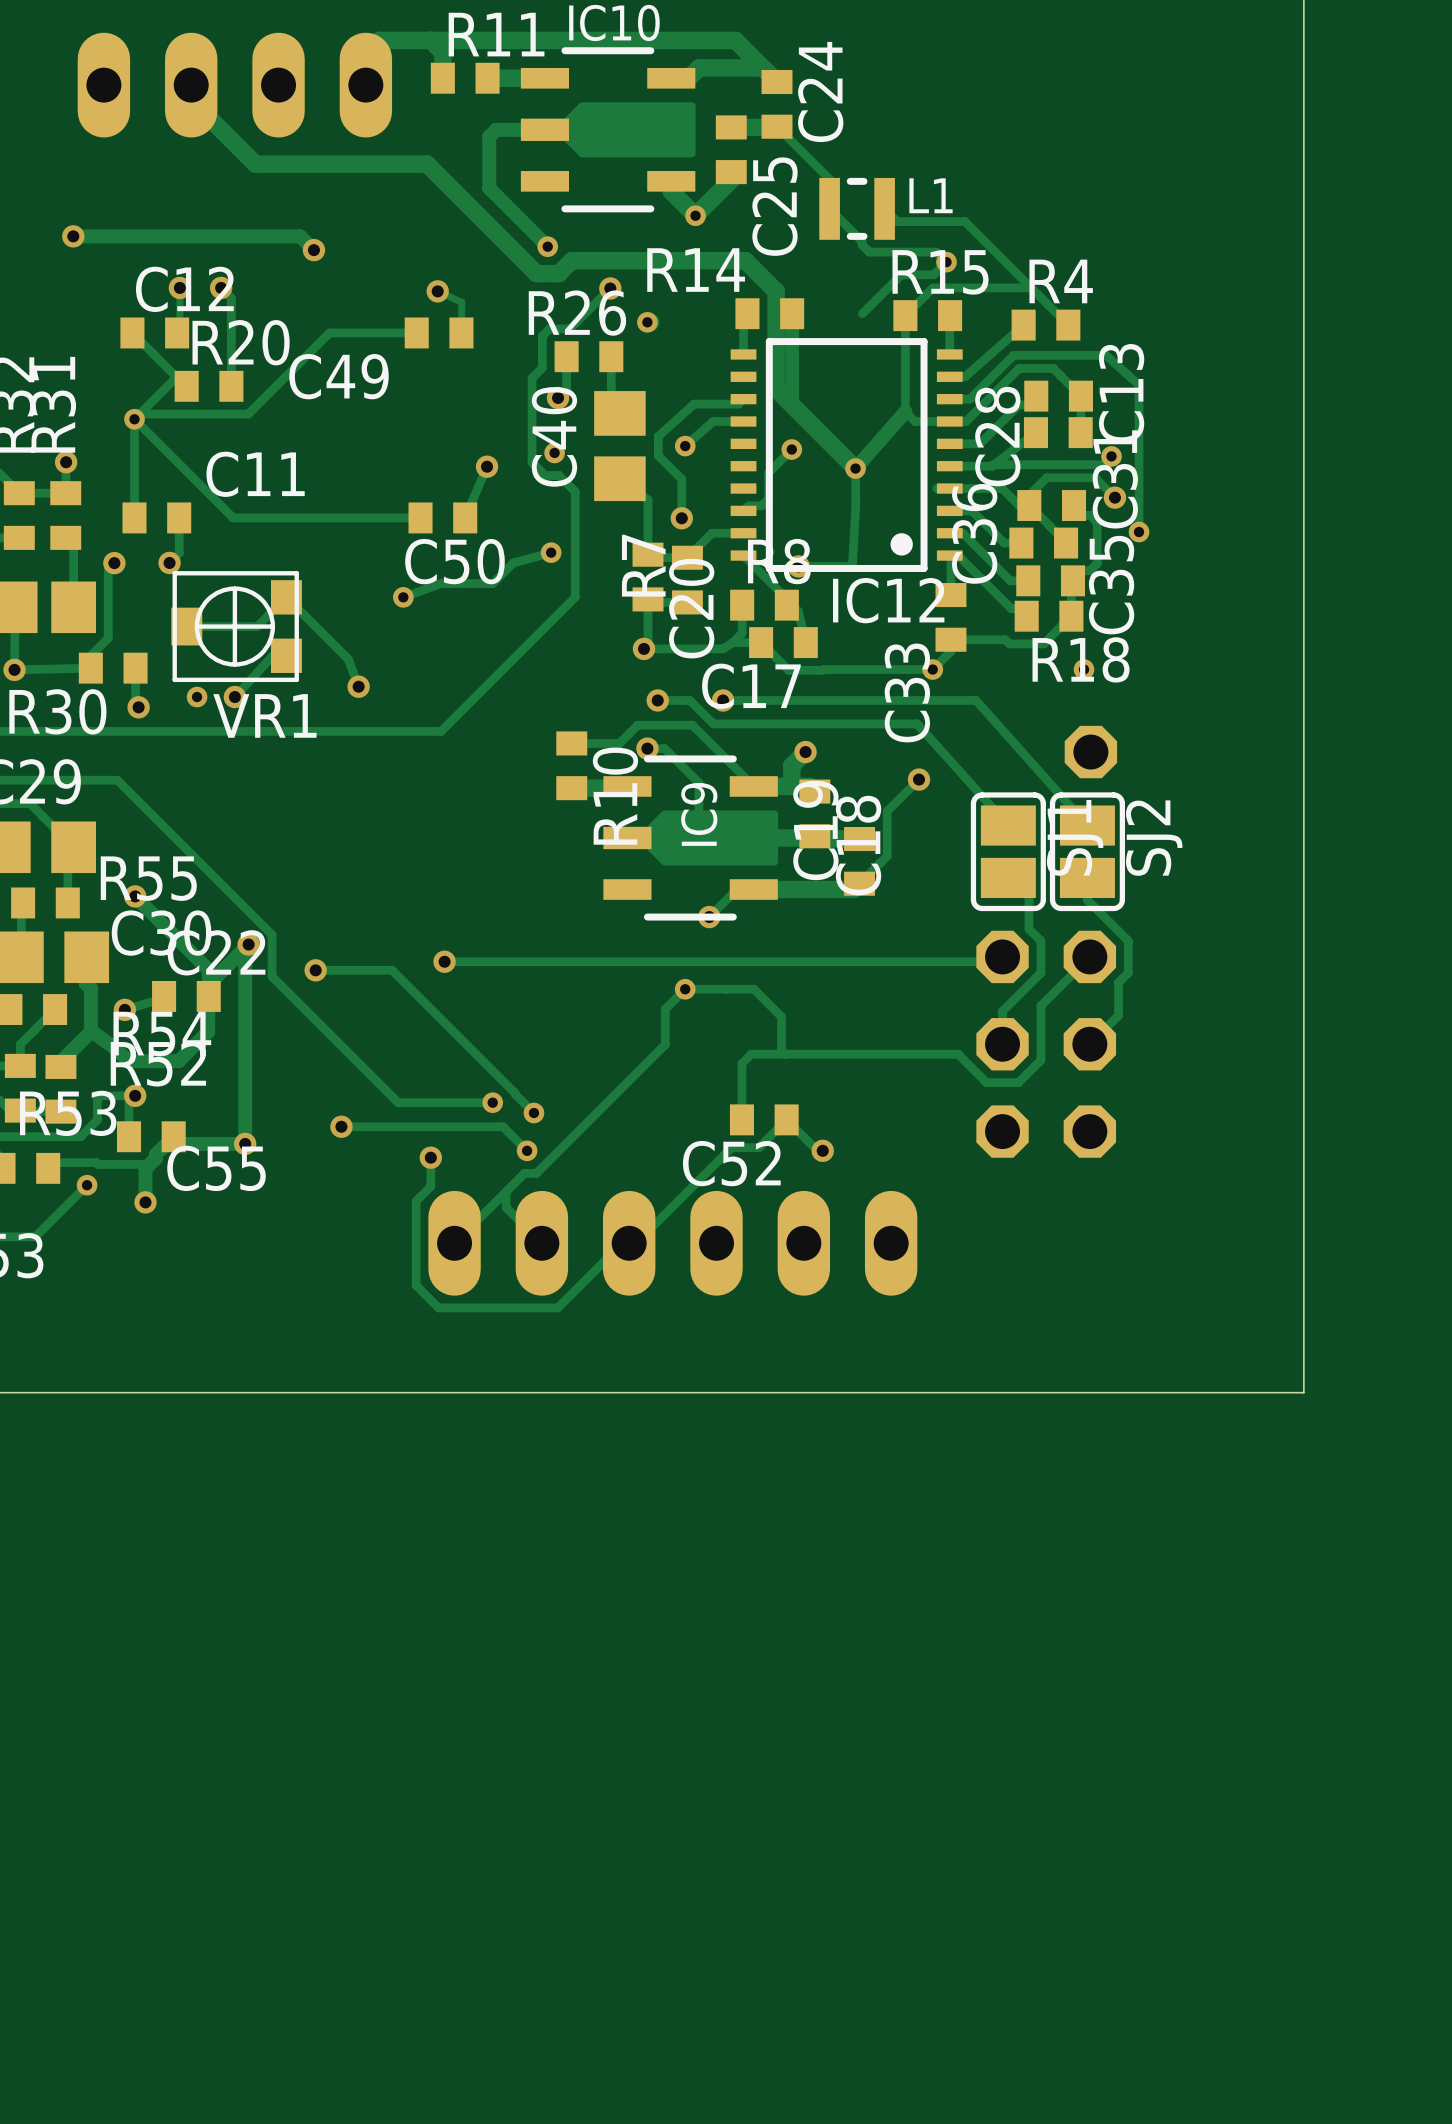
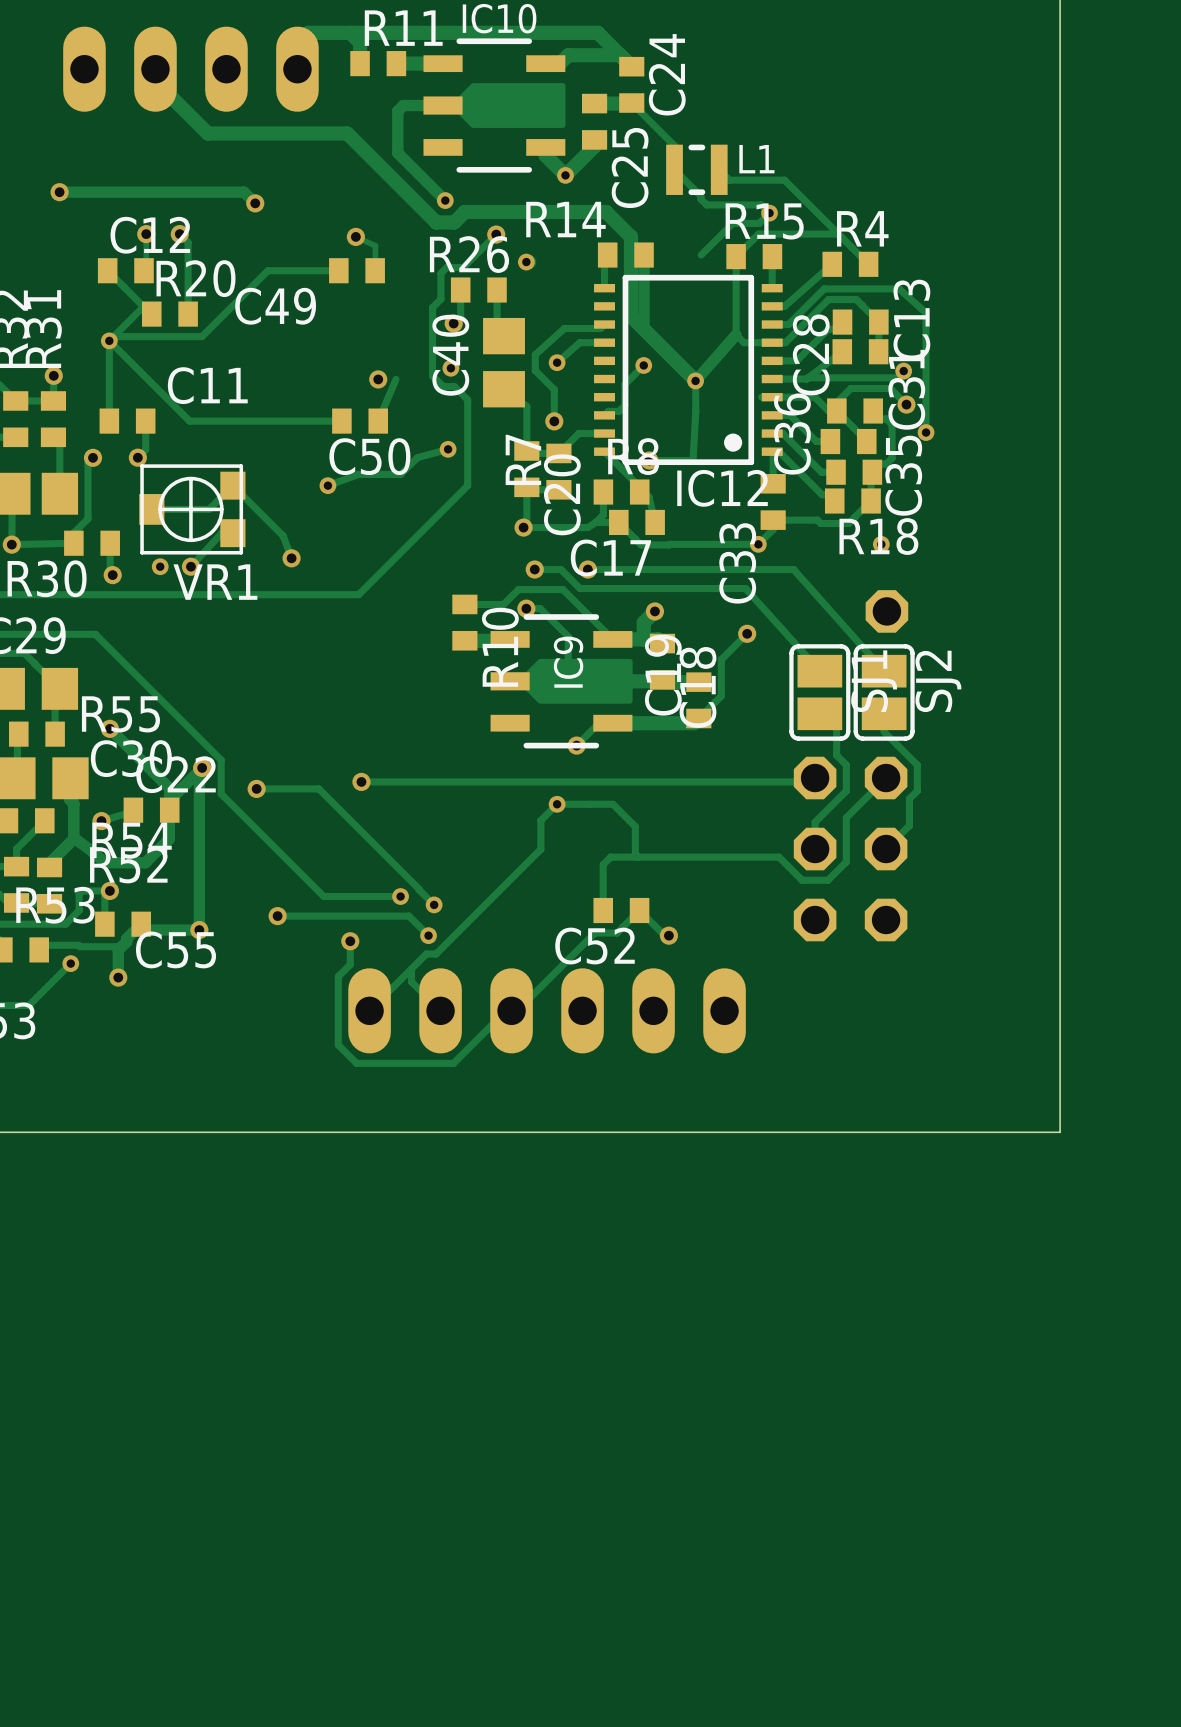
via position: (487, 466) -> (378, 379)

